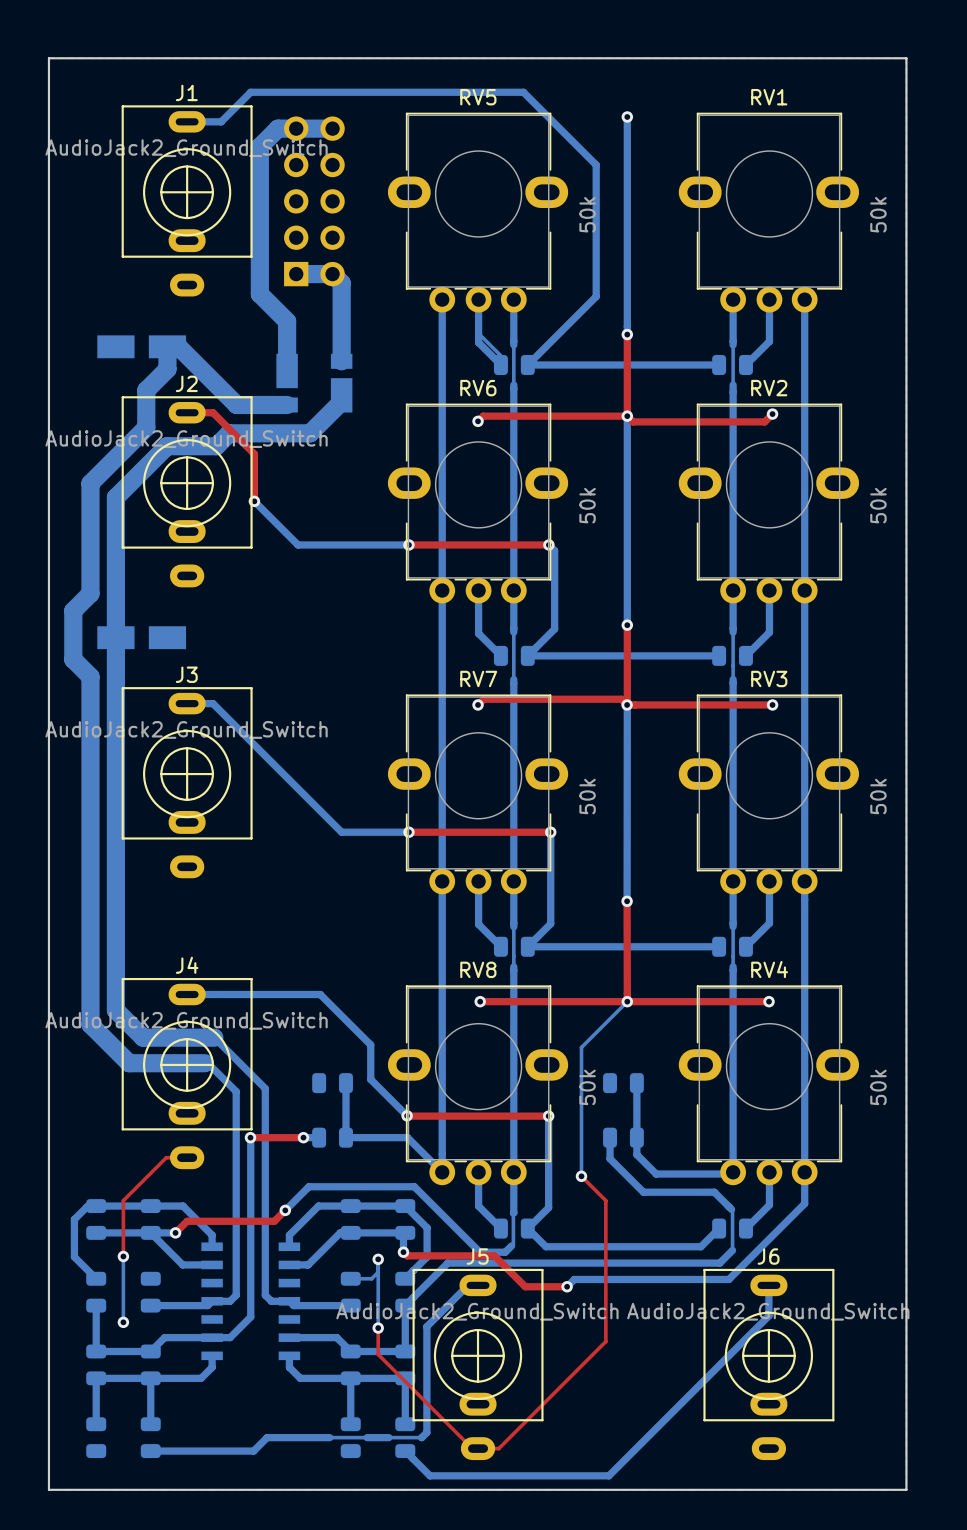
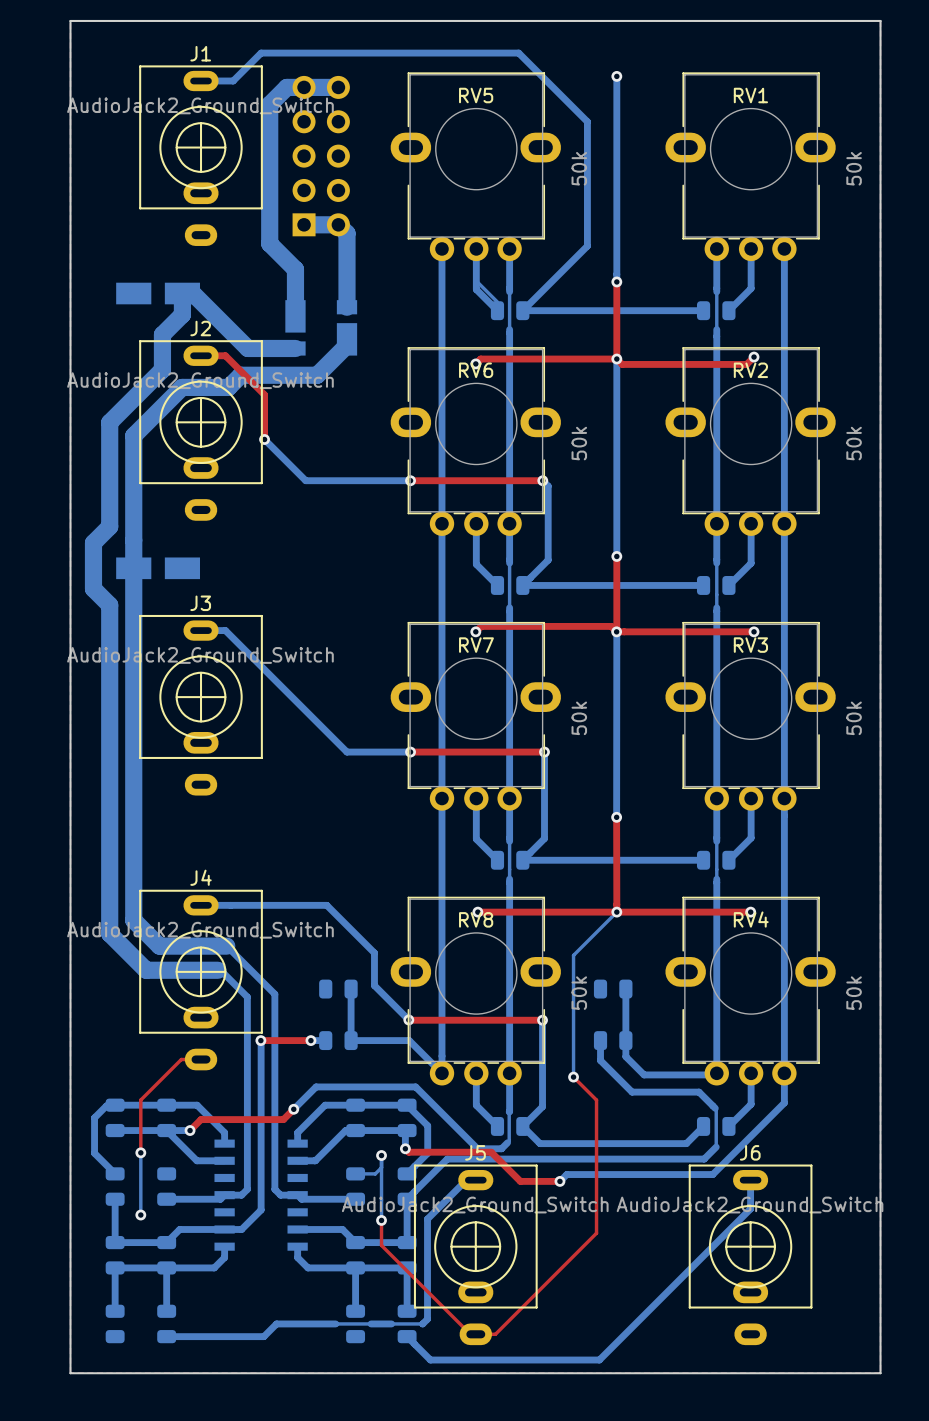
RV5 name position: RV5 (478, 97) -> RV5 (476, 95)
RV1 name position: RV1 (769, 97) -> RV1 (750, 95)
RV6 name position: RV6 (478, 388) -> RV6 (476, 370)
RV2 name position: RV2 (769, 388) -> RV2 (750, 370)
RV7 name position: RV7 (478, 678) -> RV7 (476, 645)
RV3 name position: RV3 (769, 678) -> RV3 (750, 645)
RV8 name position: RV8 (478, 969) -> RV8 (476, 919)
RV4 name position: RV4 (769, 969) -> RV4 (751, 919)

